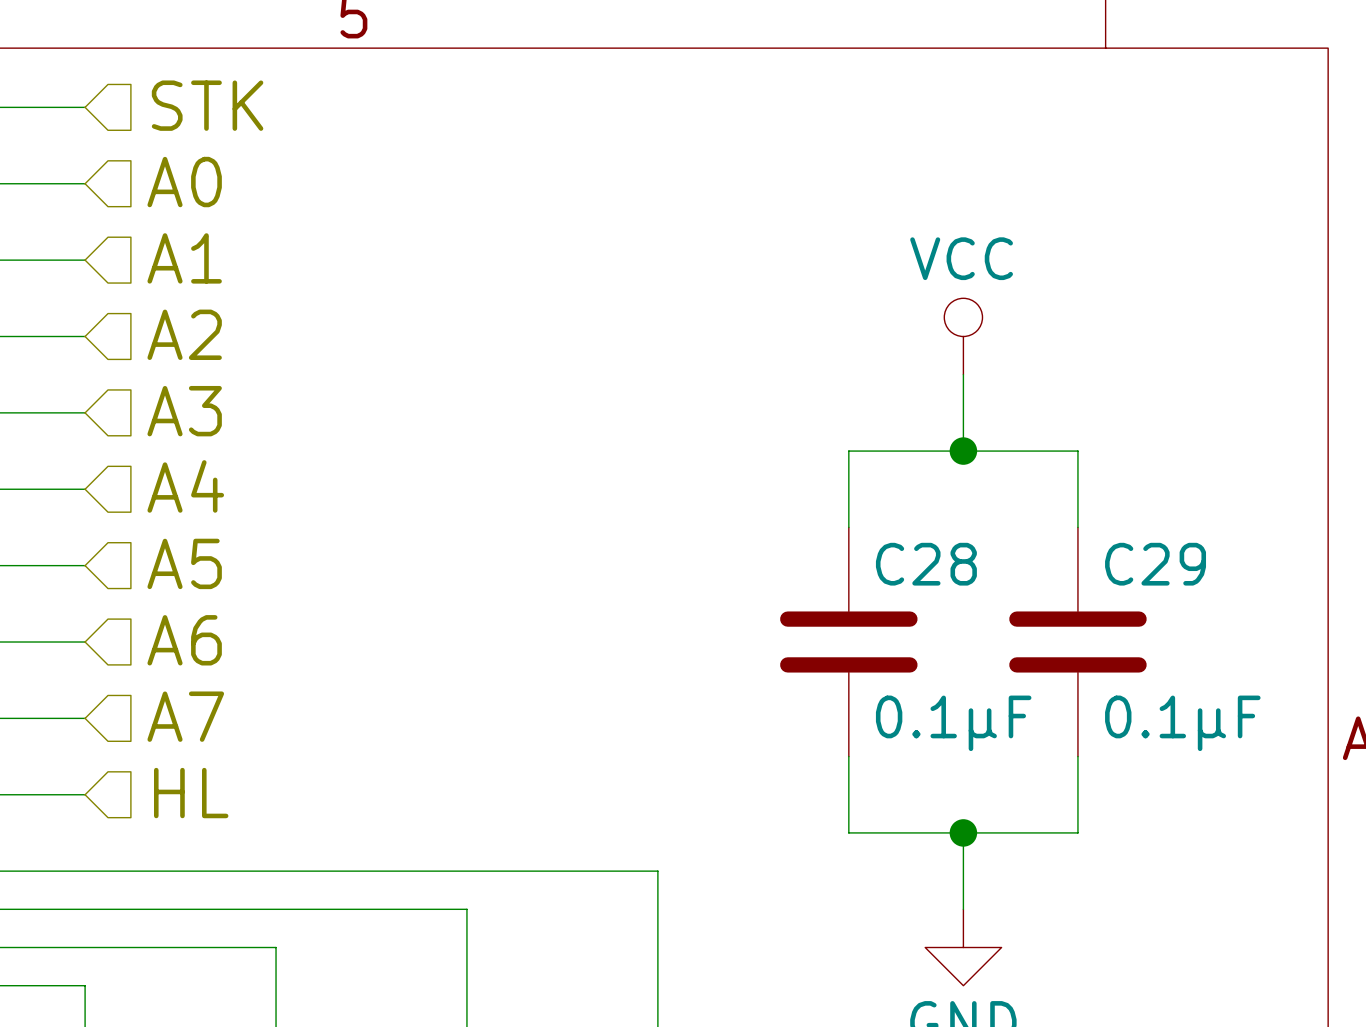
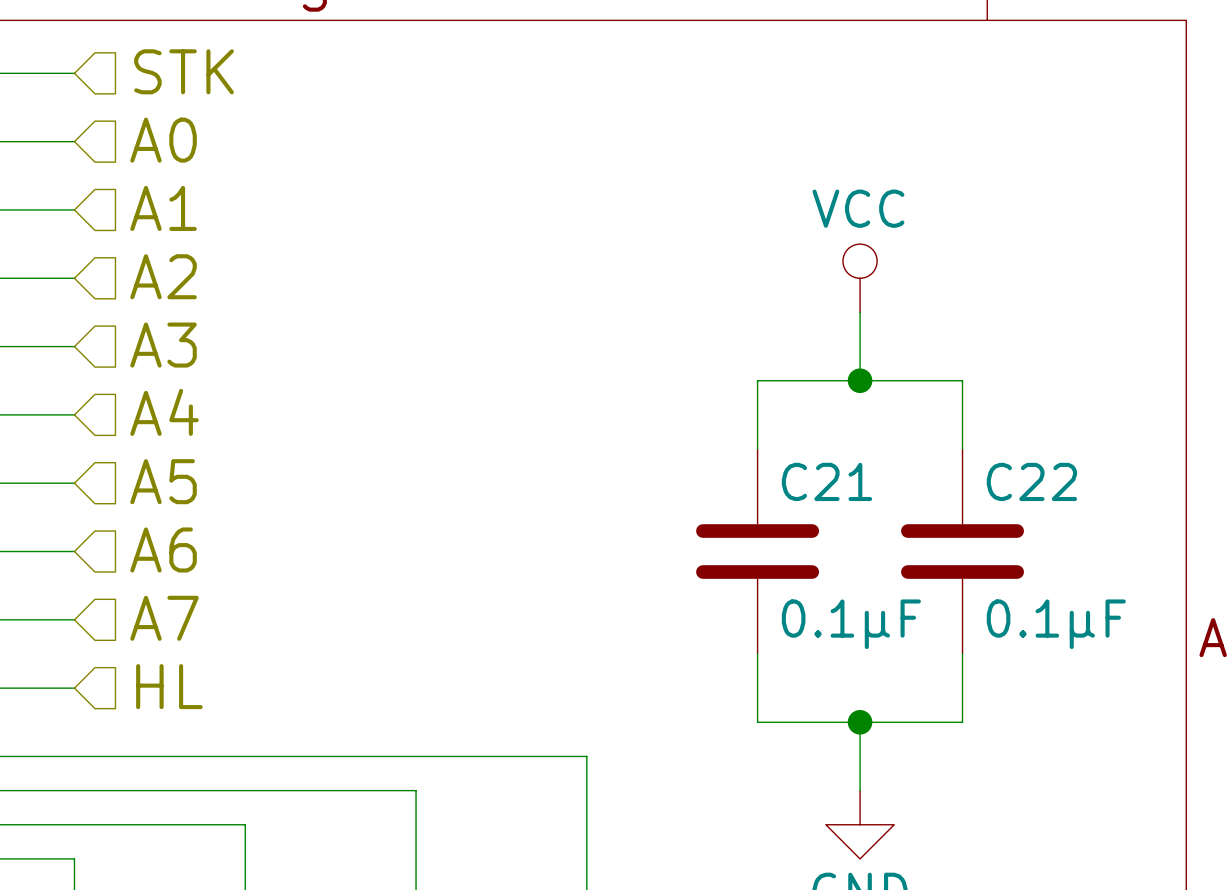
C28 name: C28 (926, 564) -> C21 (826, 481)
C29 name: C29 (1155, 564) -> C22 (1031, 481)

